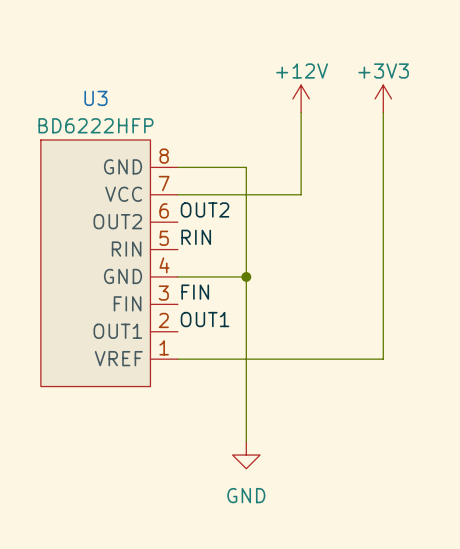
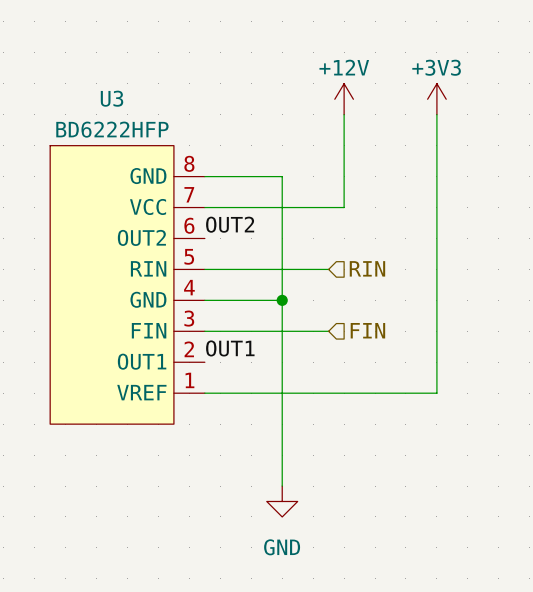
label: RIN (196, 237) -> none
wire: none -> (204, 269) (328, 269)
hierarchical label: none -> RIN (367, 268)
label: FIN (195, 292) -> none
hierarchical label: none -> FIN (367, 330)
wire: none -> (204, 331) (328, 331)

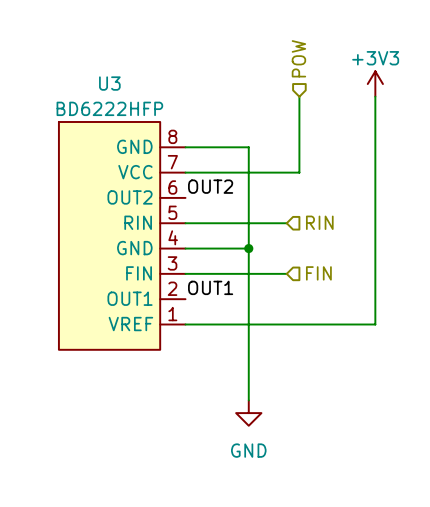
hierarchical label: none -> POW (298, 58)
power symbol: +12V (344, 99) -> none

